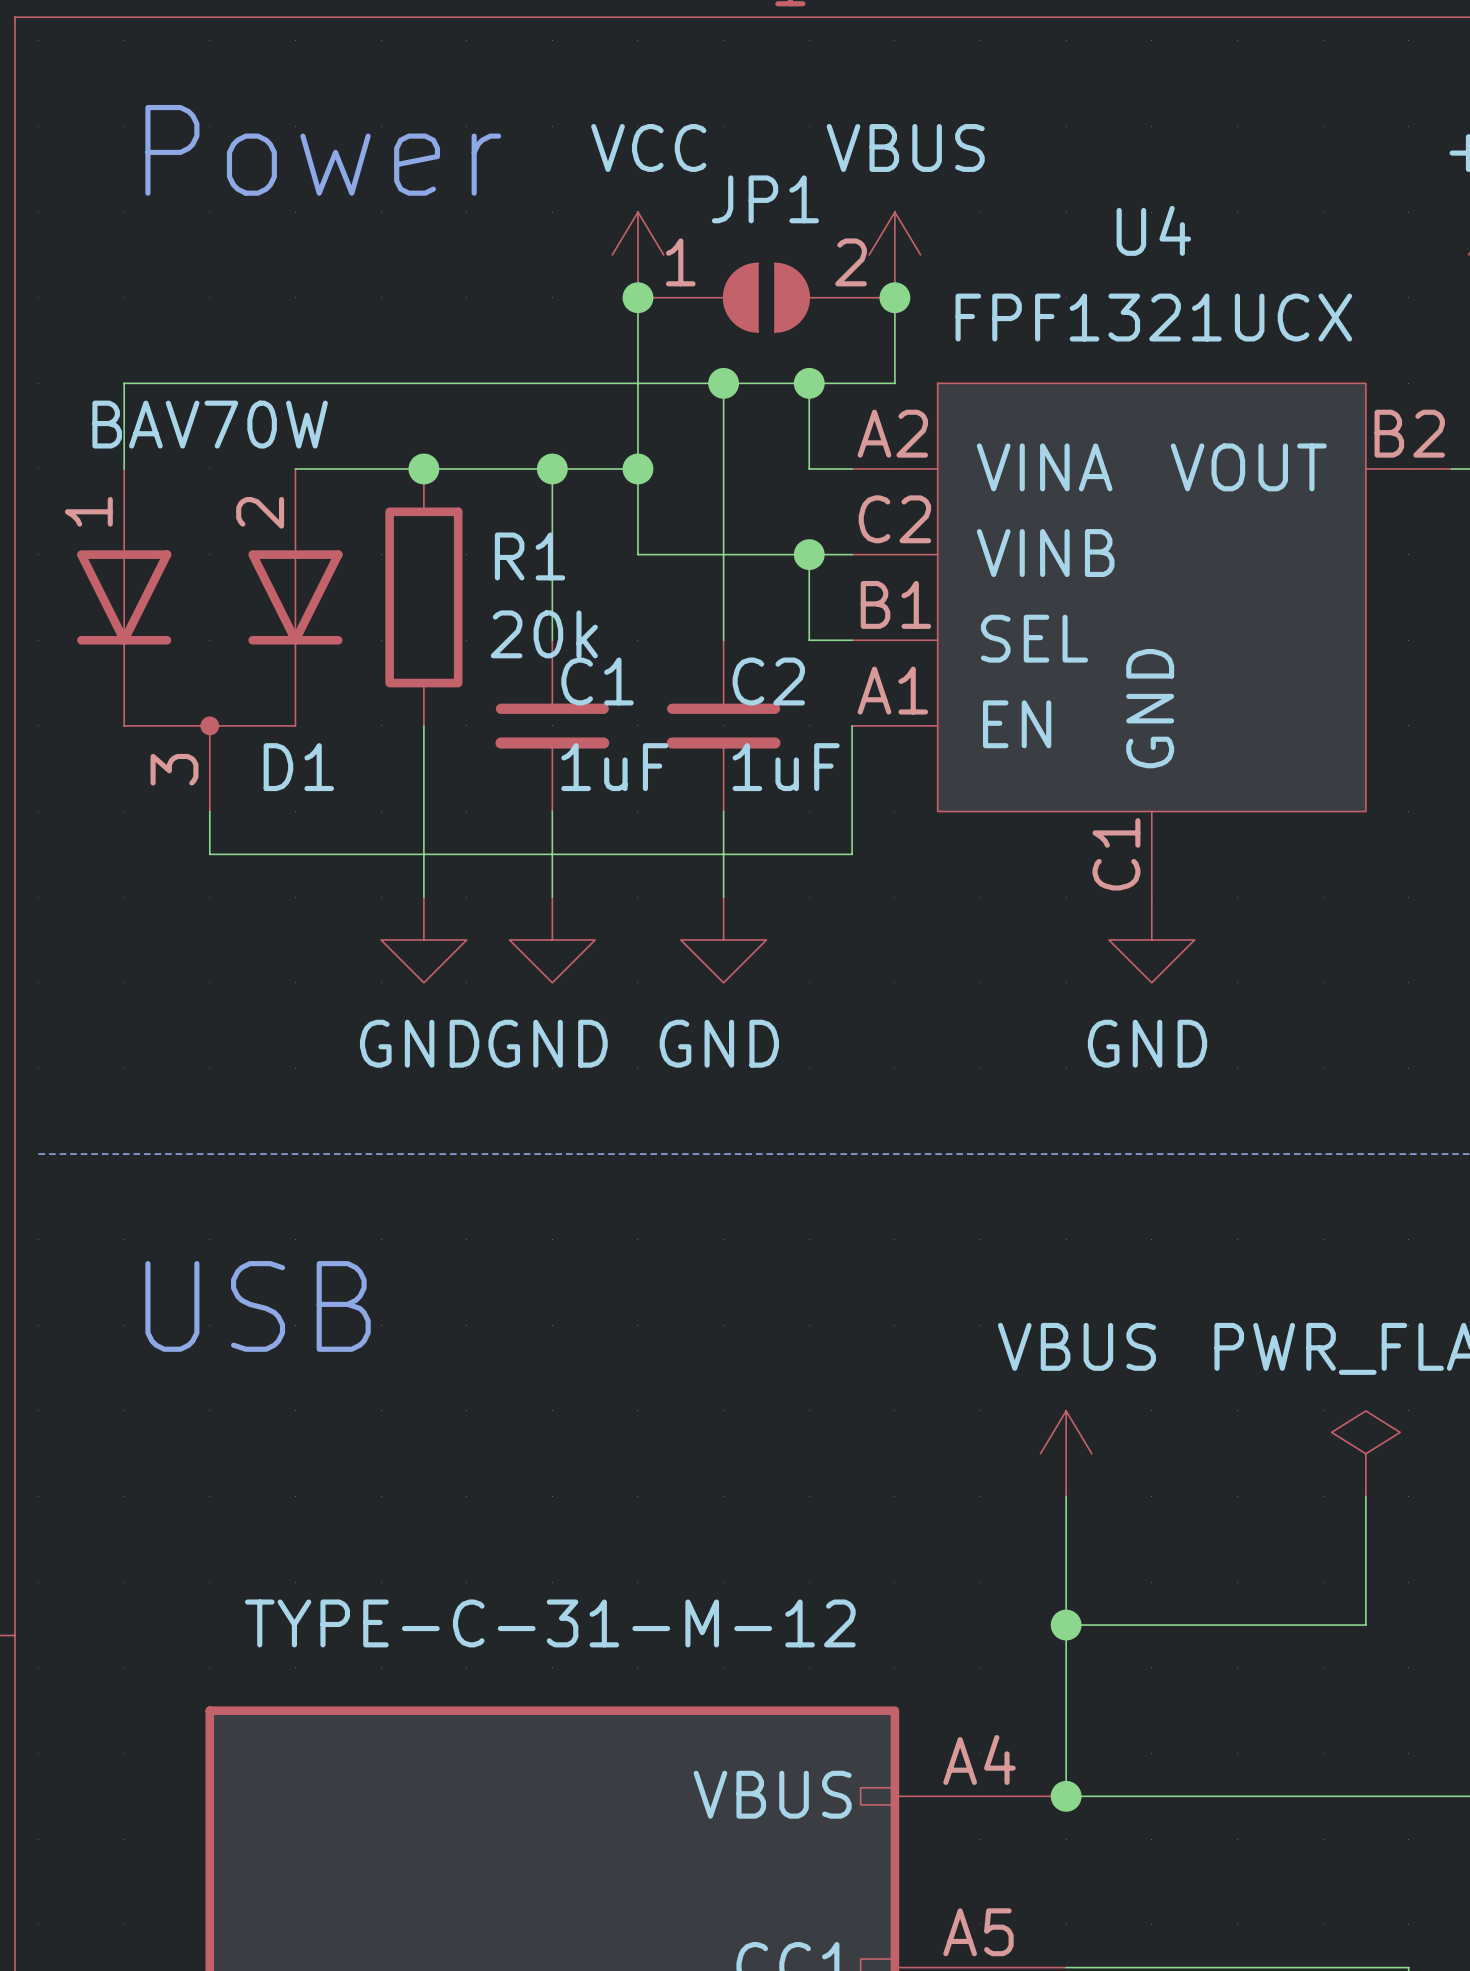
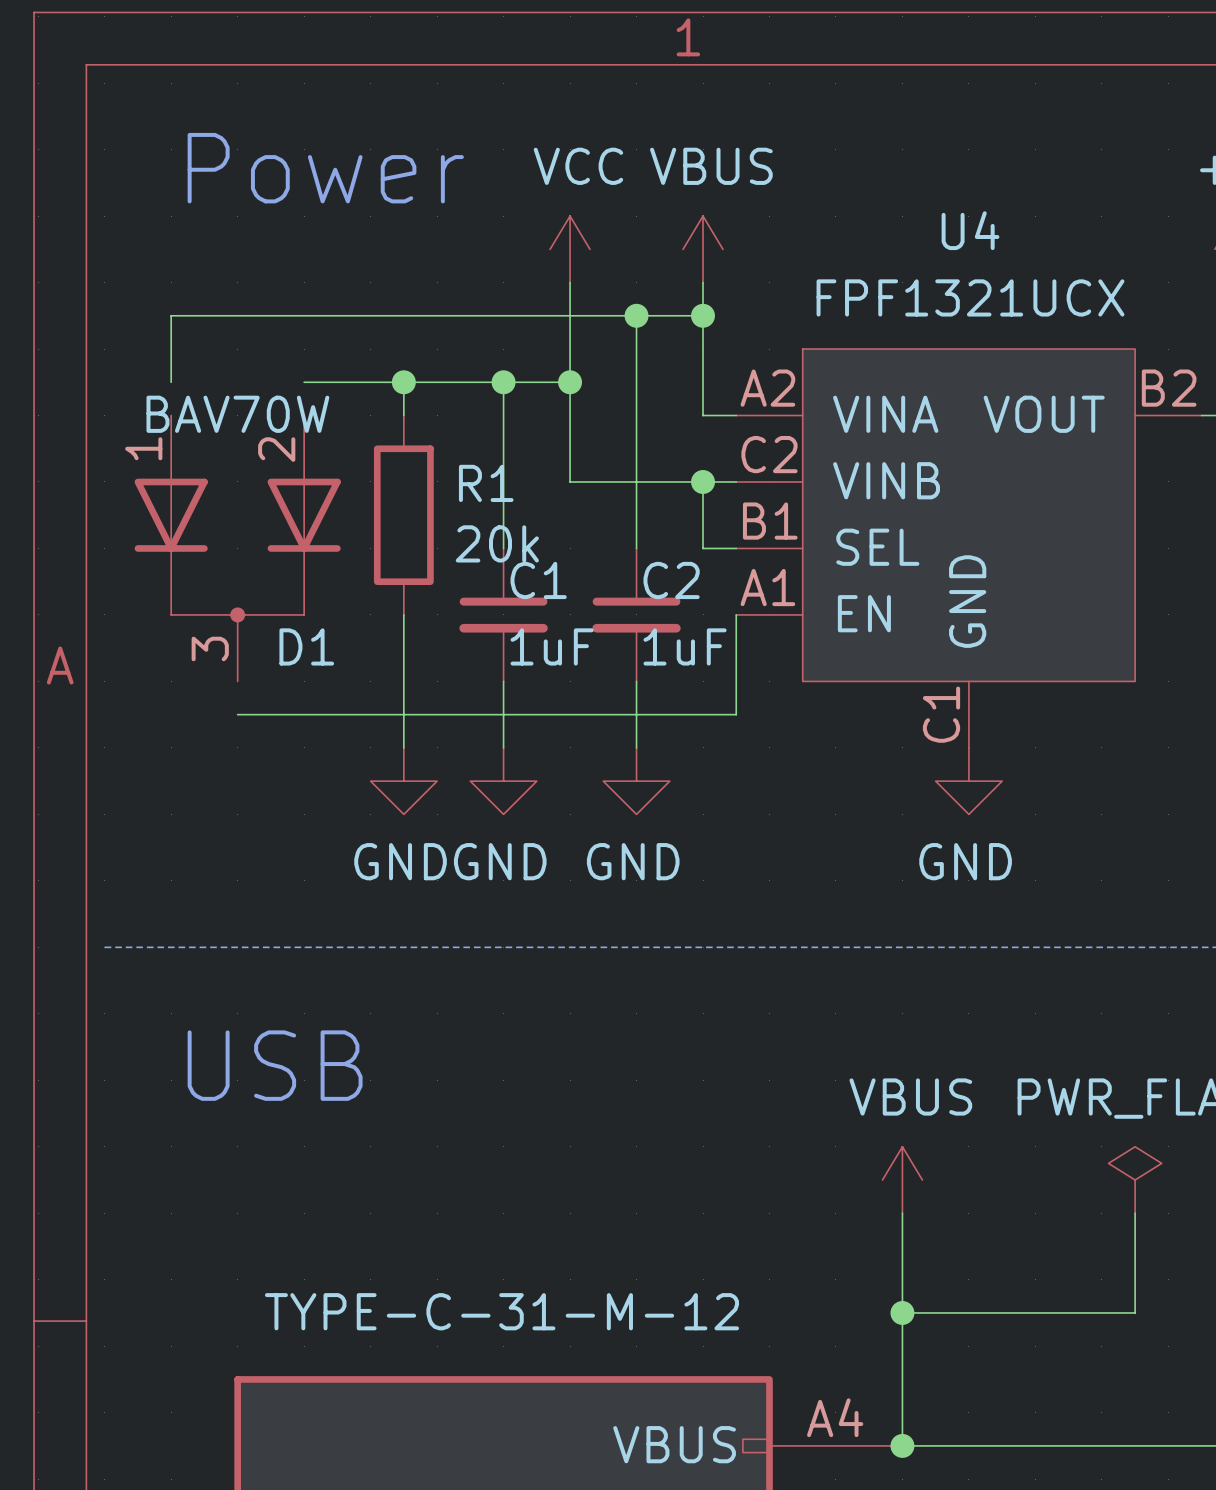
power symbol position: VBUS (894, 254) -> VBUS (703, 249)
junction: (637, 297) -> none
JP1: (766, 297) -> none
wire: none -> (703, 282) (703, 349)
wire: (894, 297) (894, 383) (124, 383) -> (703, 315) (171, 315) (171, 349)
junction: (894, 297) -> none
wire: none -> (636, 315) (636, 349)
junction position: (723, 383) -> (636, 315)
junction position: (809, 383) -> (703, 315)
D1 value position: BAV70W (210, 424) -> BAV70W (237, 414)
wire: (124, 426) (124, 468) -> (403, 382) (403, 415)
wire: (295, 468) (637, 468) -> (304, 382) (570, 382)
junction position: (423, 468) -> (403, 382)
junction position: (552, 468) -> (503, 382)
junction position: (637, 468) -> (570, 382)
wire: (209, 811) (209, 854) -> (503, 382) (503, 415)

